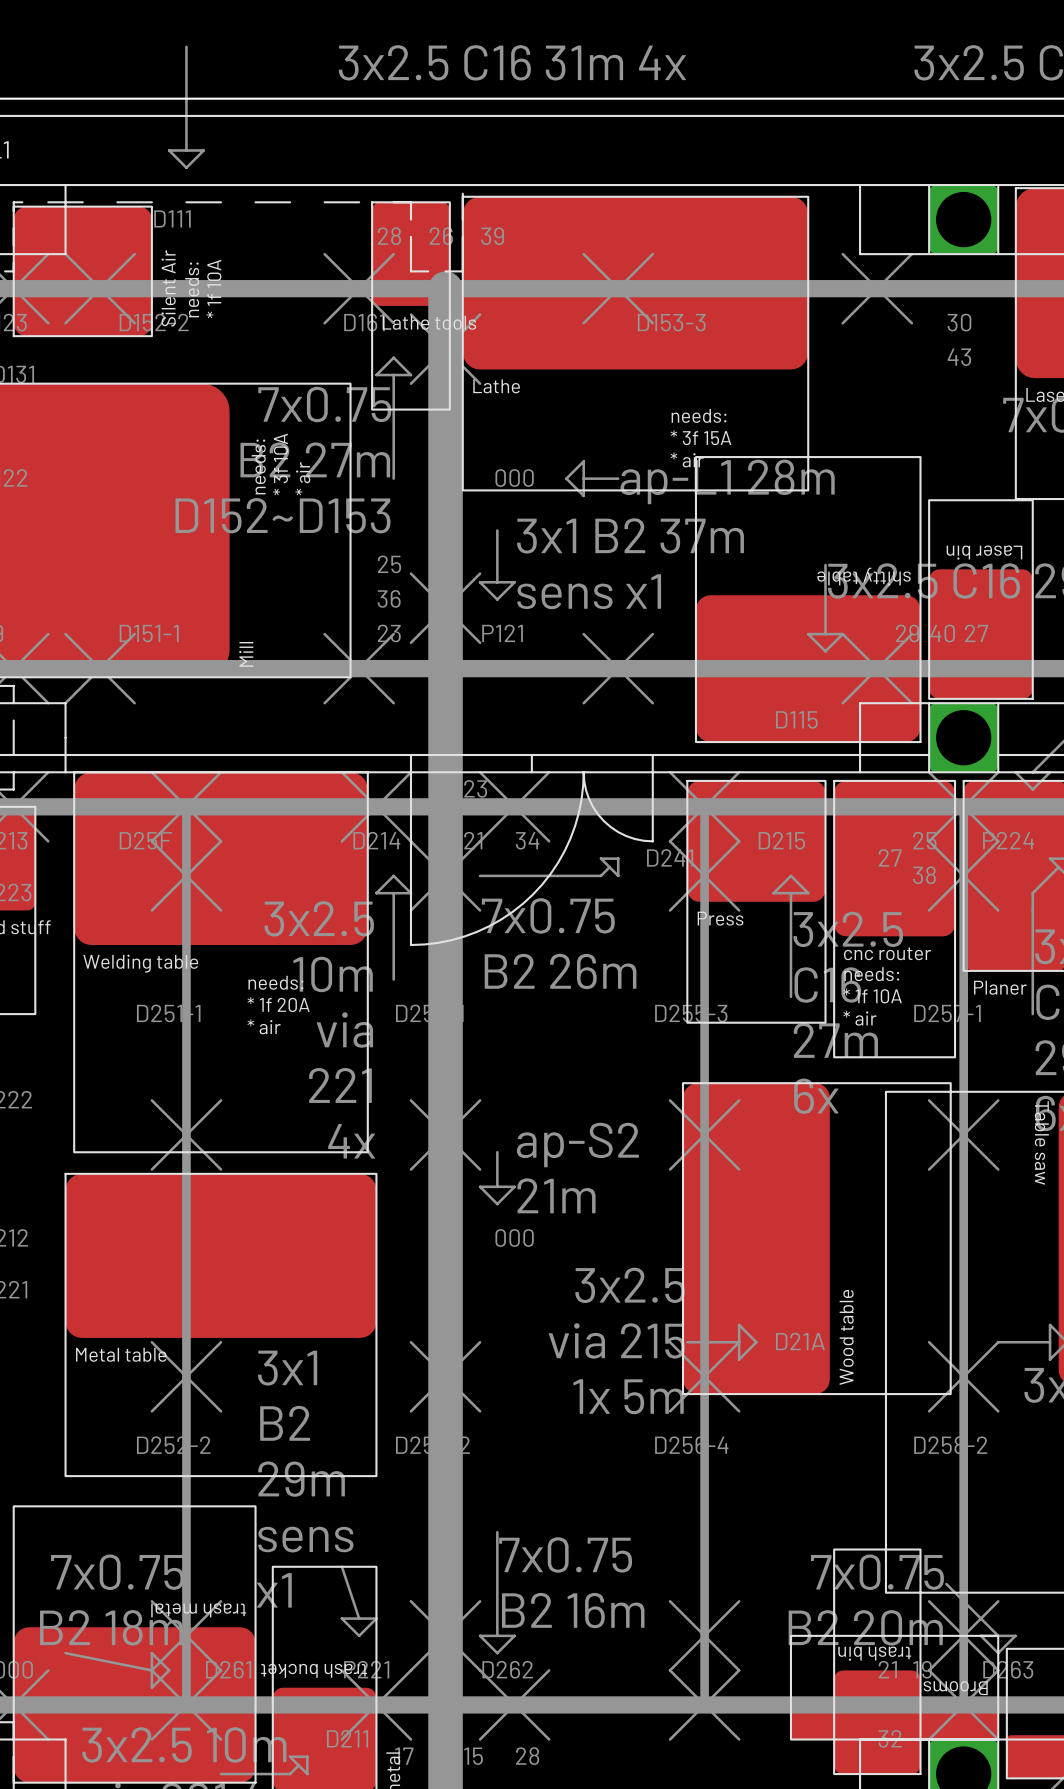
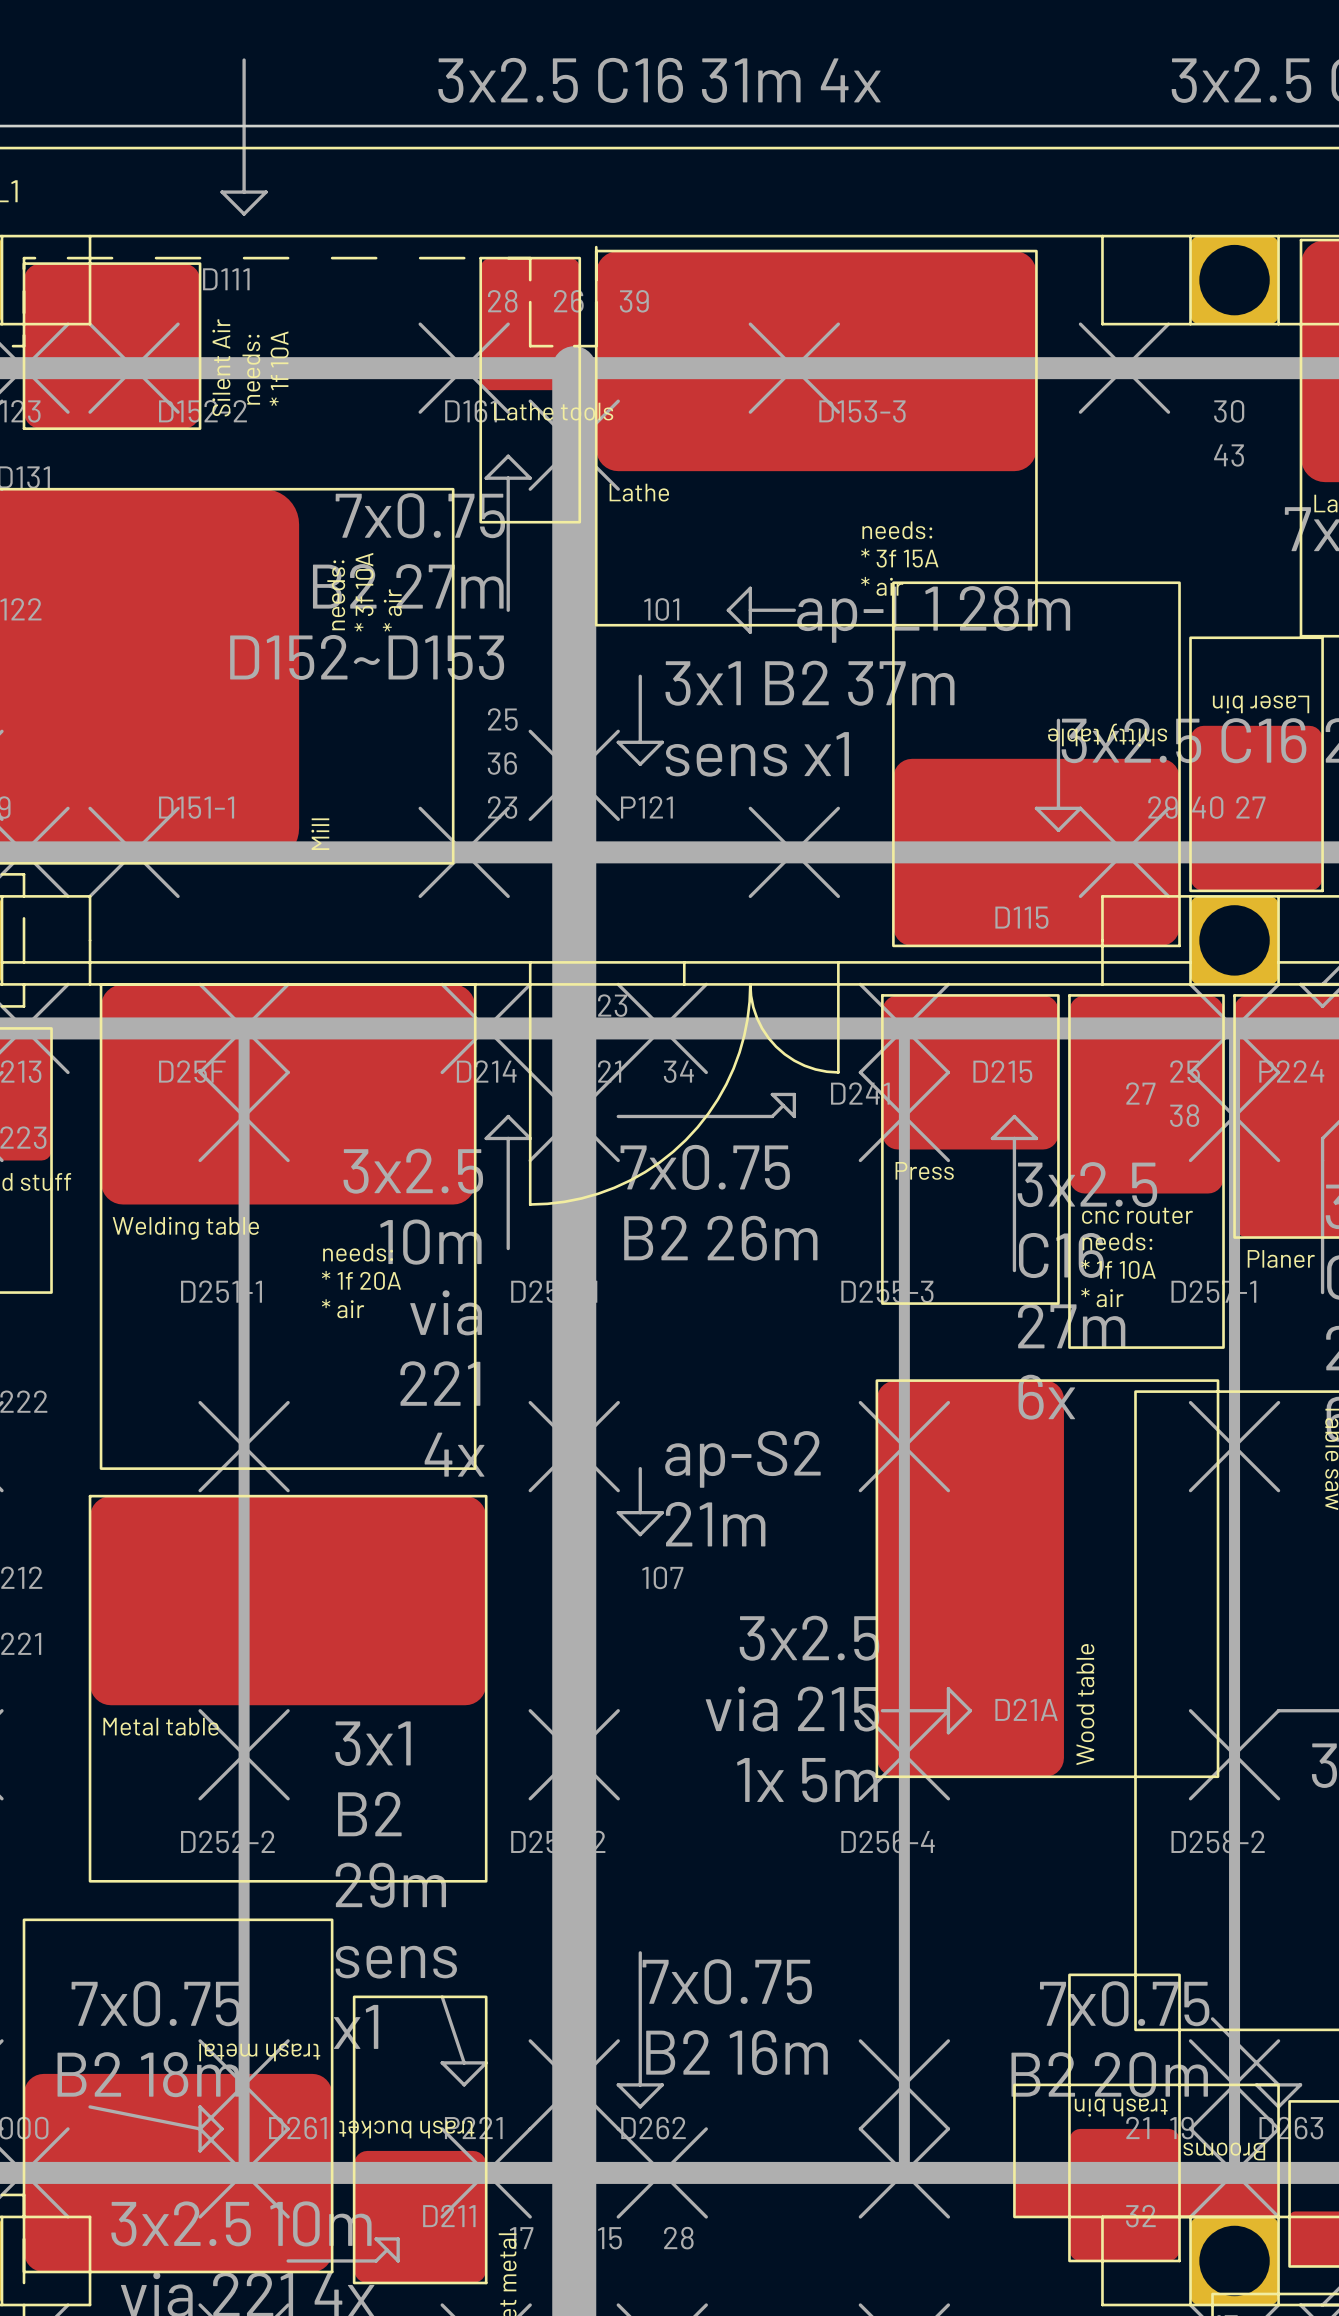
text: 000 (514, 478) -> 101 (661, 609)
text: 000 (514, 1237) -> 107 (662, 1577)

